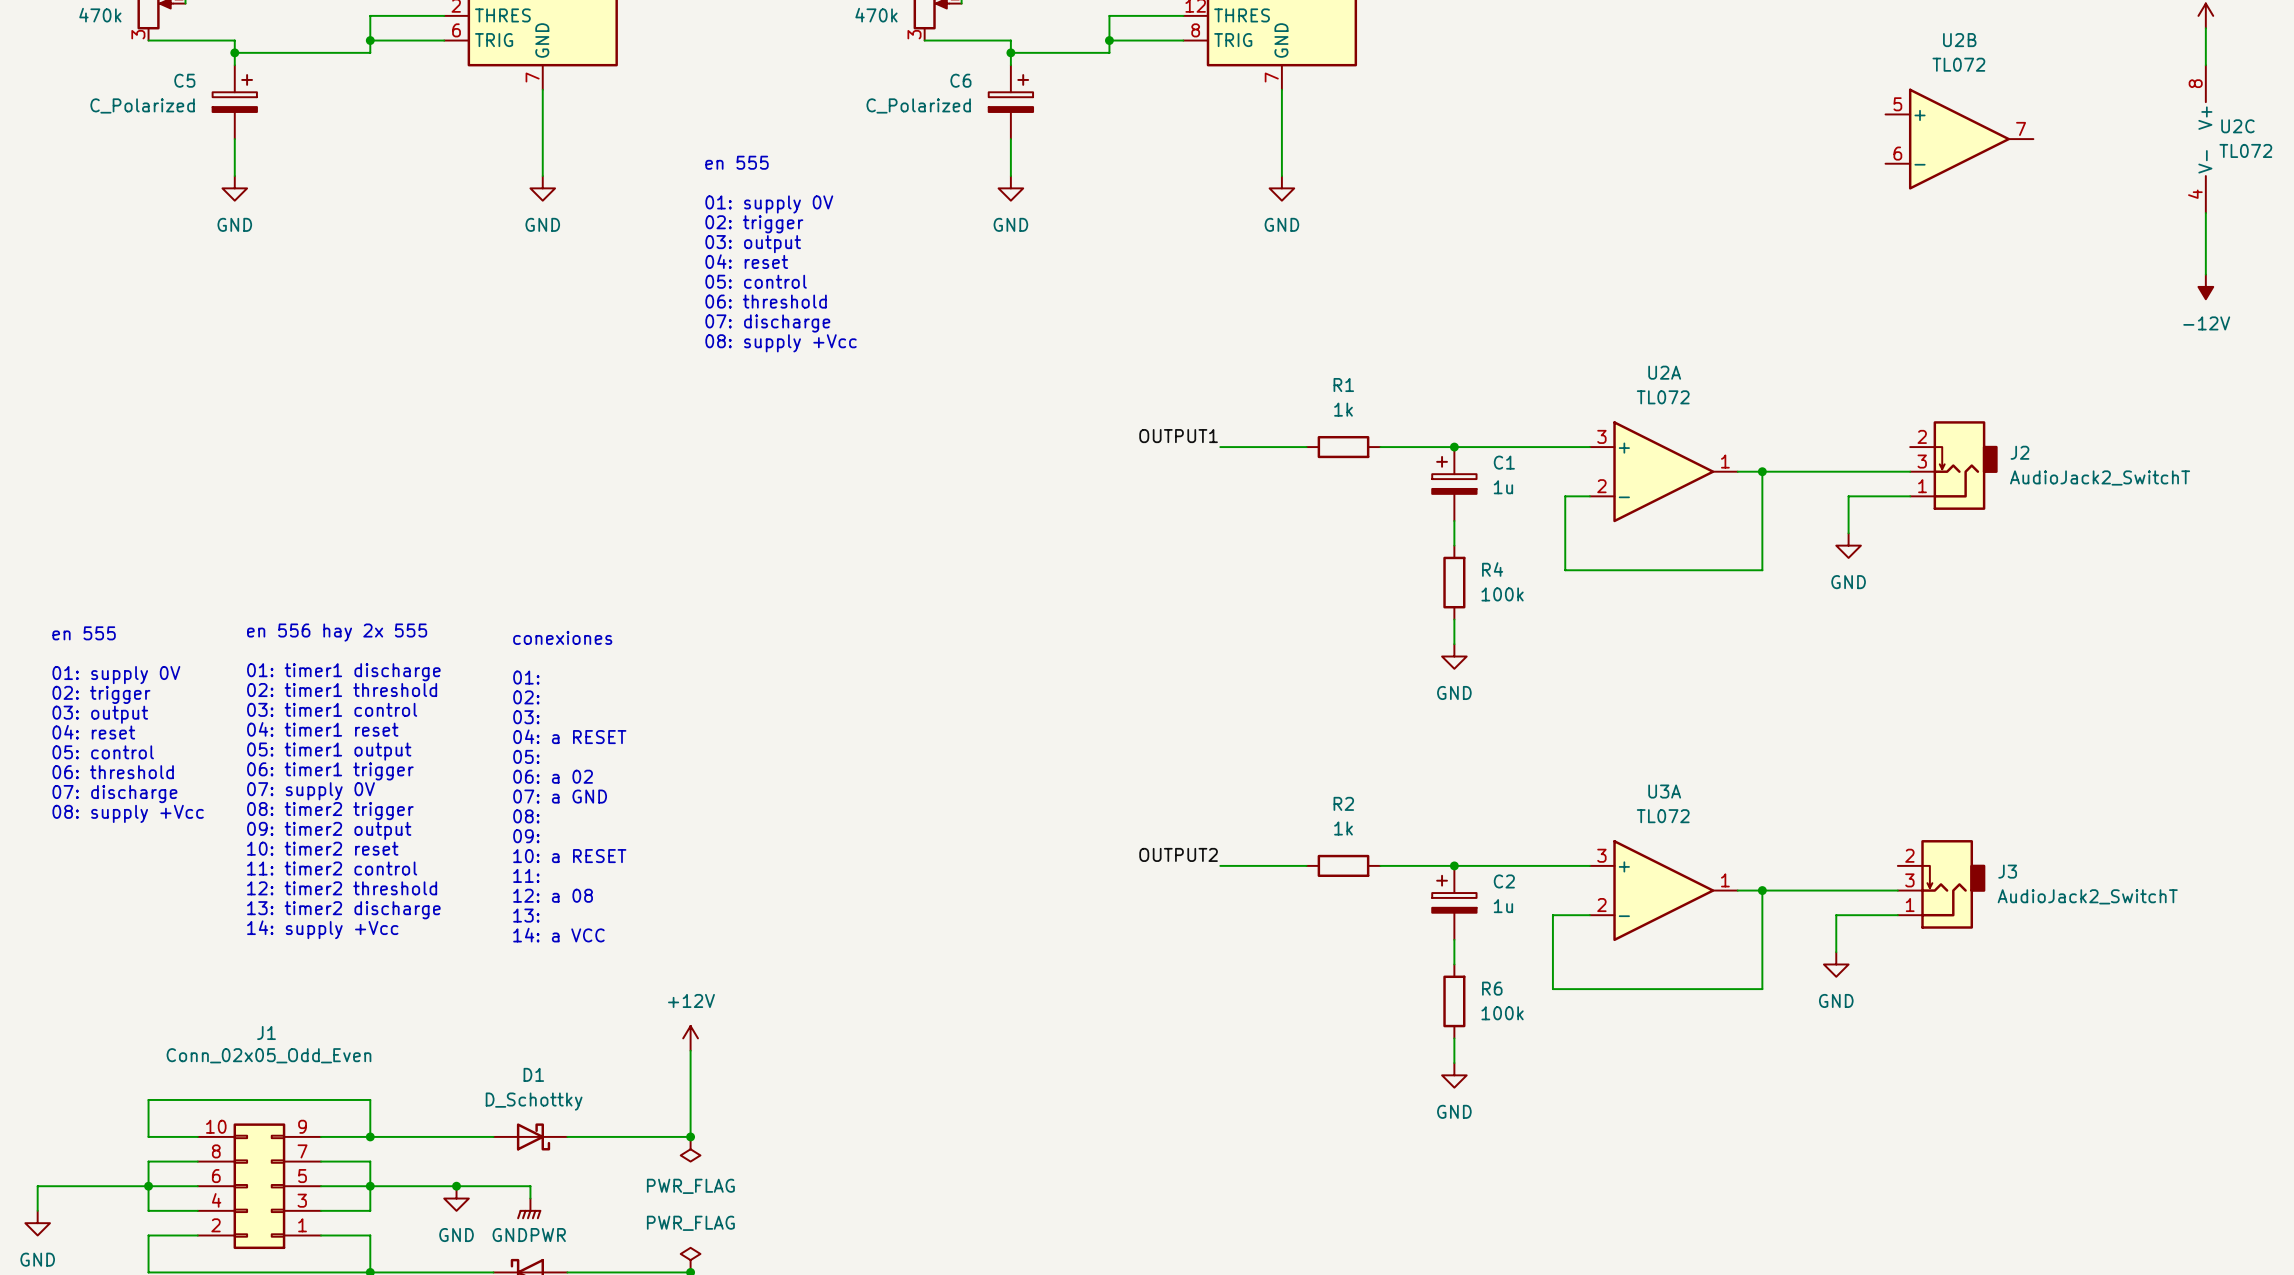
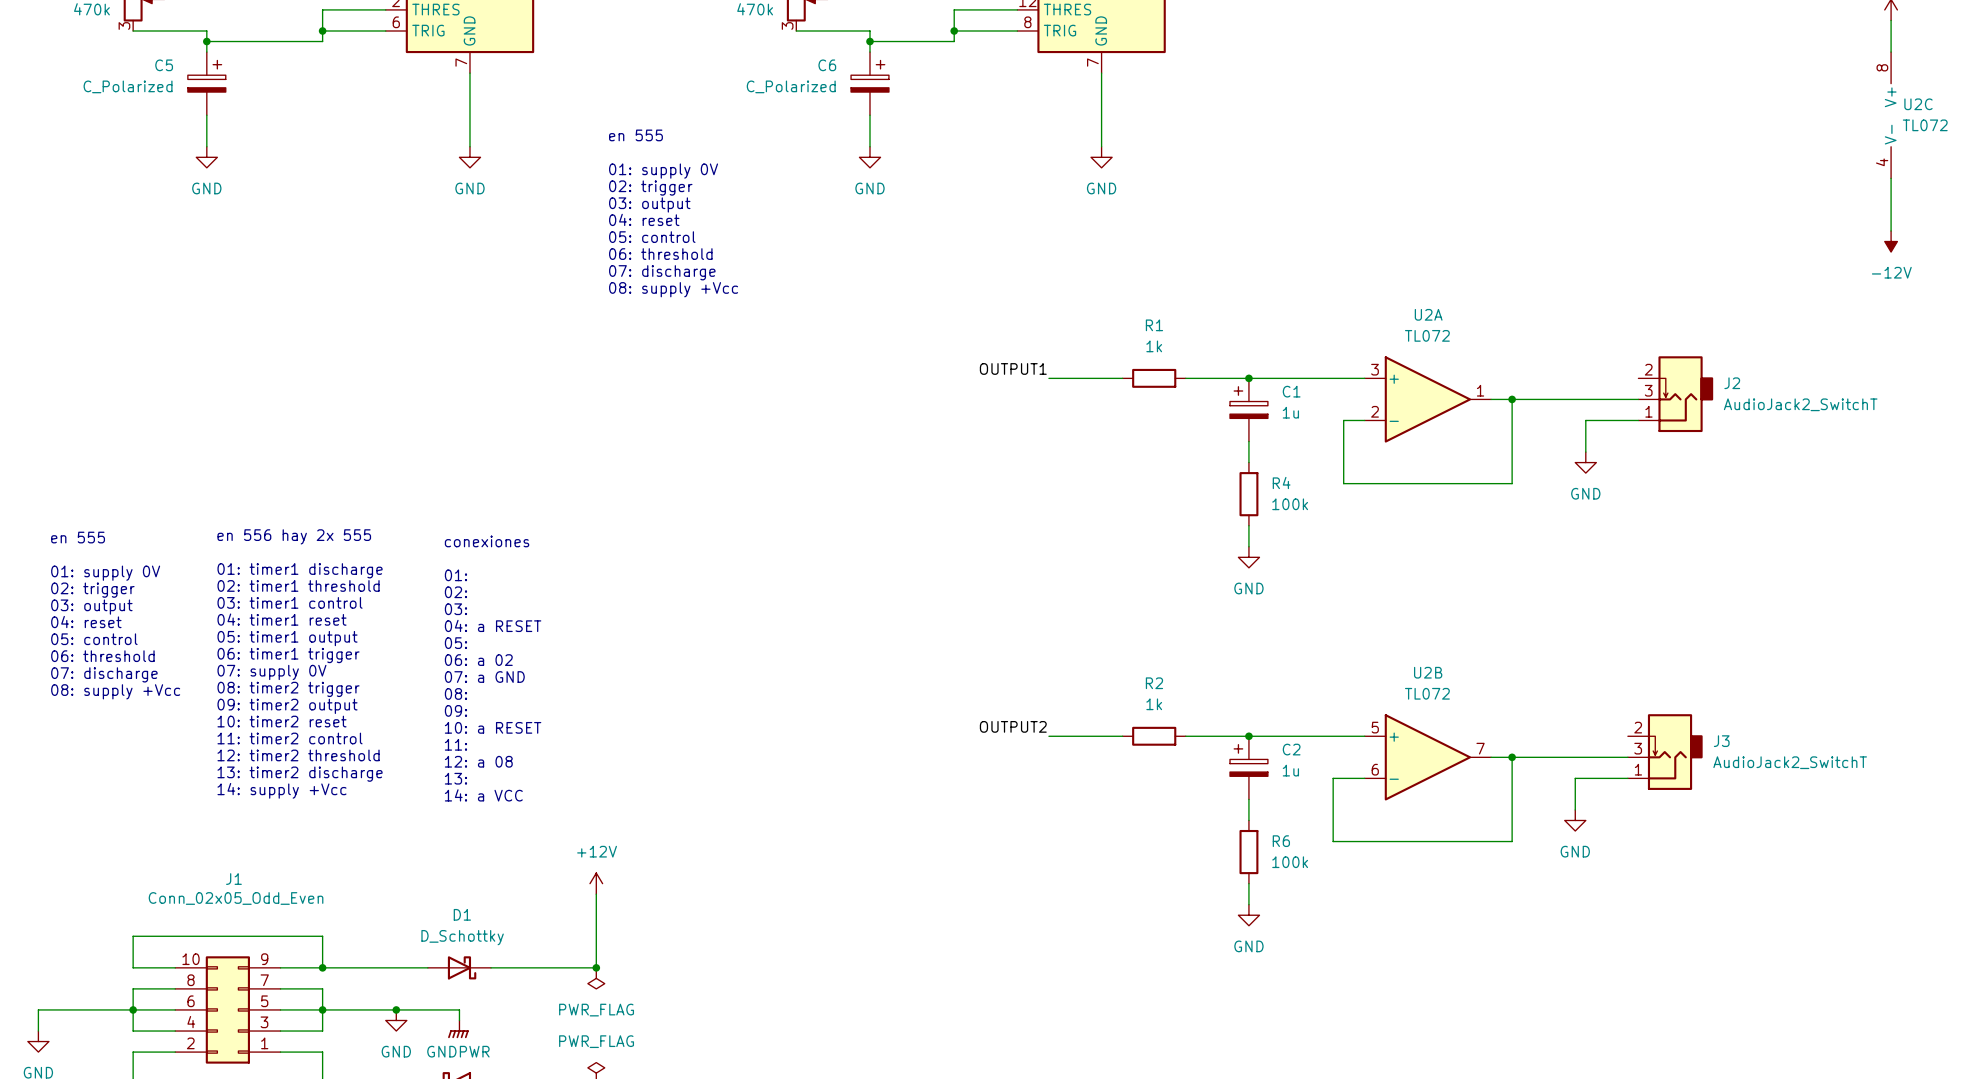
U2B position: (1959, 139) -> (1427, 757)
U3A: TL072 (1663, 890) -> none

